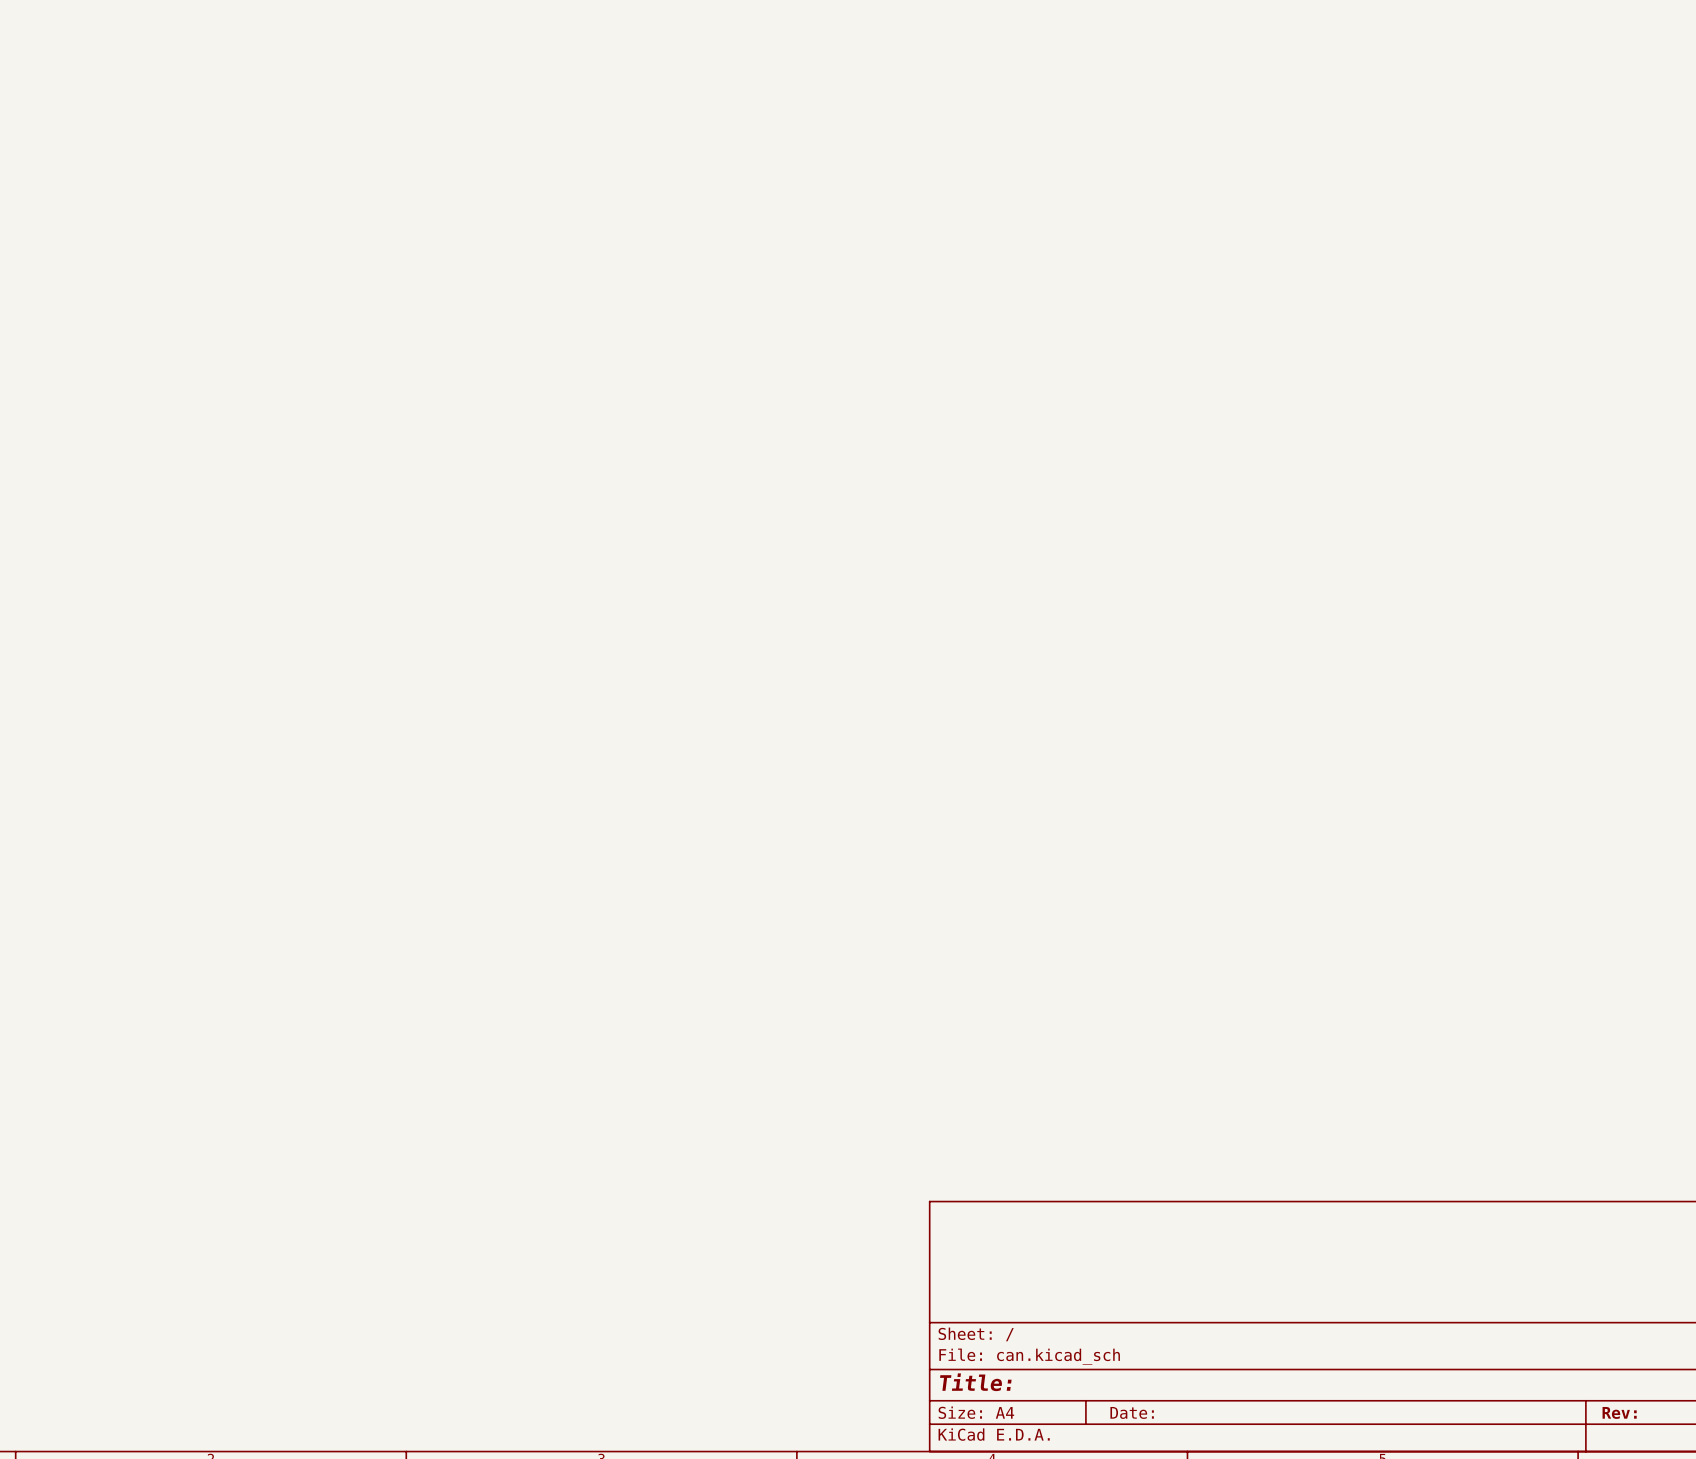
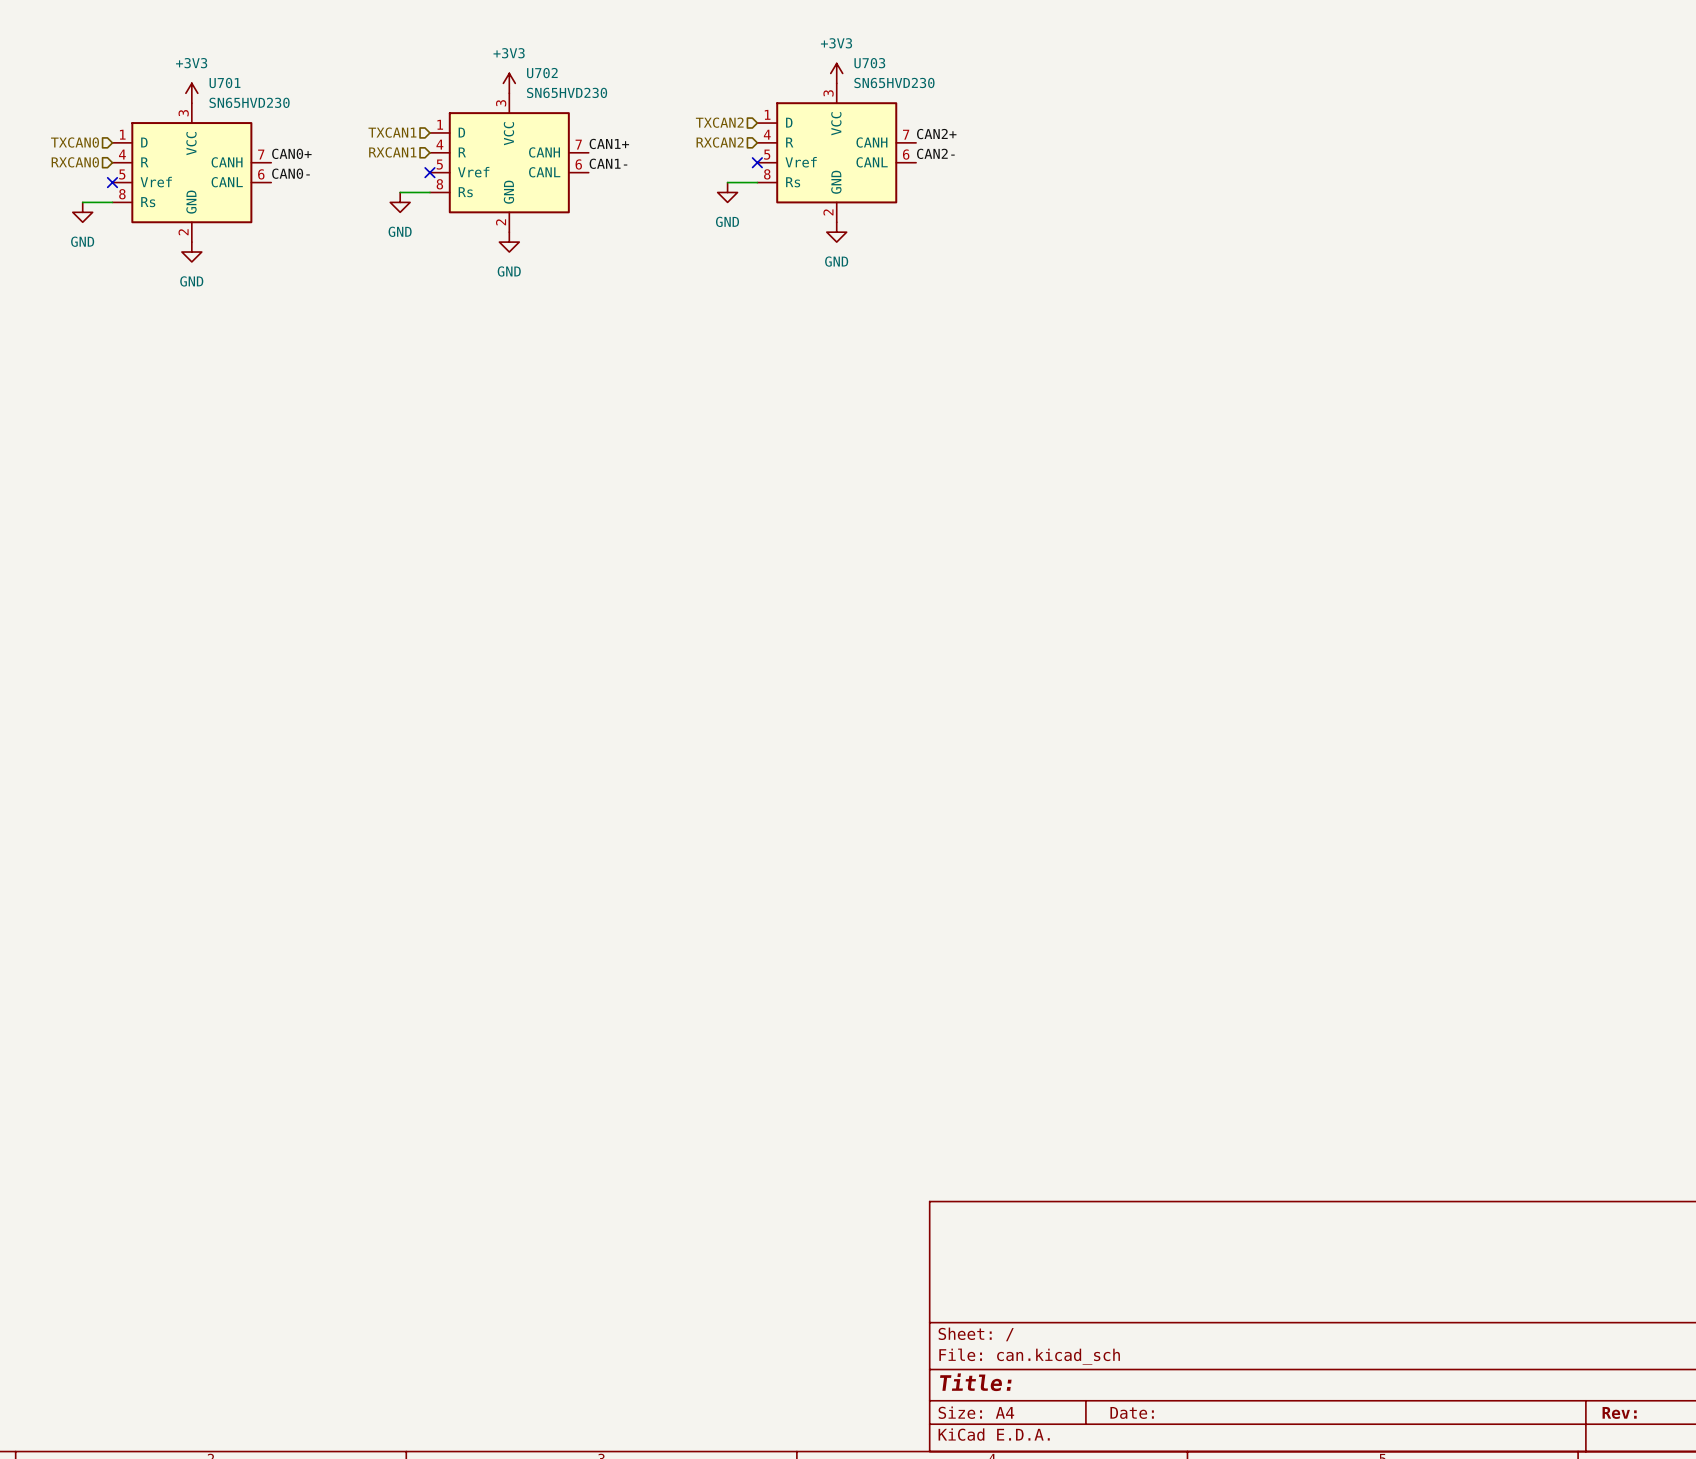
power symbol: none -> +3V3 (836, 73)
power symbol: none -> +3V3 (509, 83)
power symbol: none -> +3V3 (191, 93)
hierarchical label: none -> TXCAN2 (719, 122)
hierarchical label: none -> TXCAN1 (392, 132)
label: none -> CAN2+ (936, 134)
hierarchical label: none -> TXCAN0 (75, 142)
hierarchical label: none -> RXCAN2 (720, 142)
label: none -> CAN1+ (609, 143)
hierarchical label: none -> RXCAN1 (392, 152)
U703: none -> SN65HVD230 (836, 152)
label: none -> CAN0+ (291, 153)
label: none -> CAN2- (935, 153)
hierarchical label: none -> RXCAN0 (75, 162)
U702: none -> SN65HVD230 (509, 162)
no-connect mark: none -> (757, 162)
label: none -> CAN1- (608, 163)
U701: none -> SN65HVD230 (191, 172)
no-connect mark: none -> (429, 172)
label: none -> CAN0- (290, 173)
no-connect mark: none -> (112, 182)
wire: none -> (727, 182) (757, 182)
wire: none -> (400, 192) (429, 192)
power symbol: none -> GND (727, 192)
wire: none -> (82, 202) (112, 202)
power symbol: none -> GND (400, 202)
power symbol: none -> GND (82, 212)
power symbol: none -> GND (836, 232)
power symbol: none -> GND (509, 242)
power symbol: none -> GND (191, 252)

